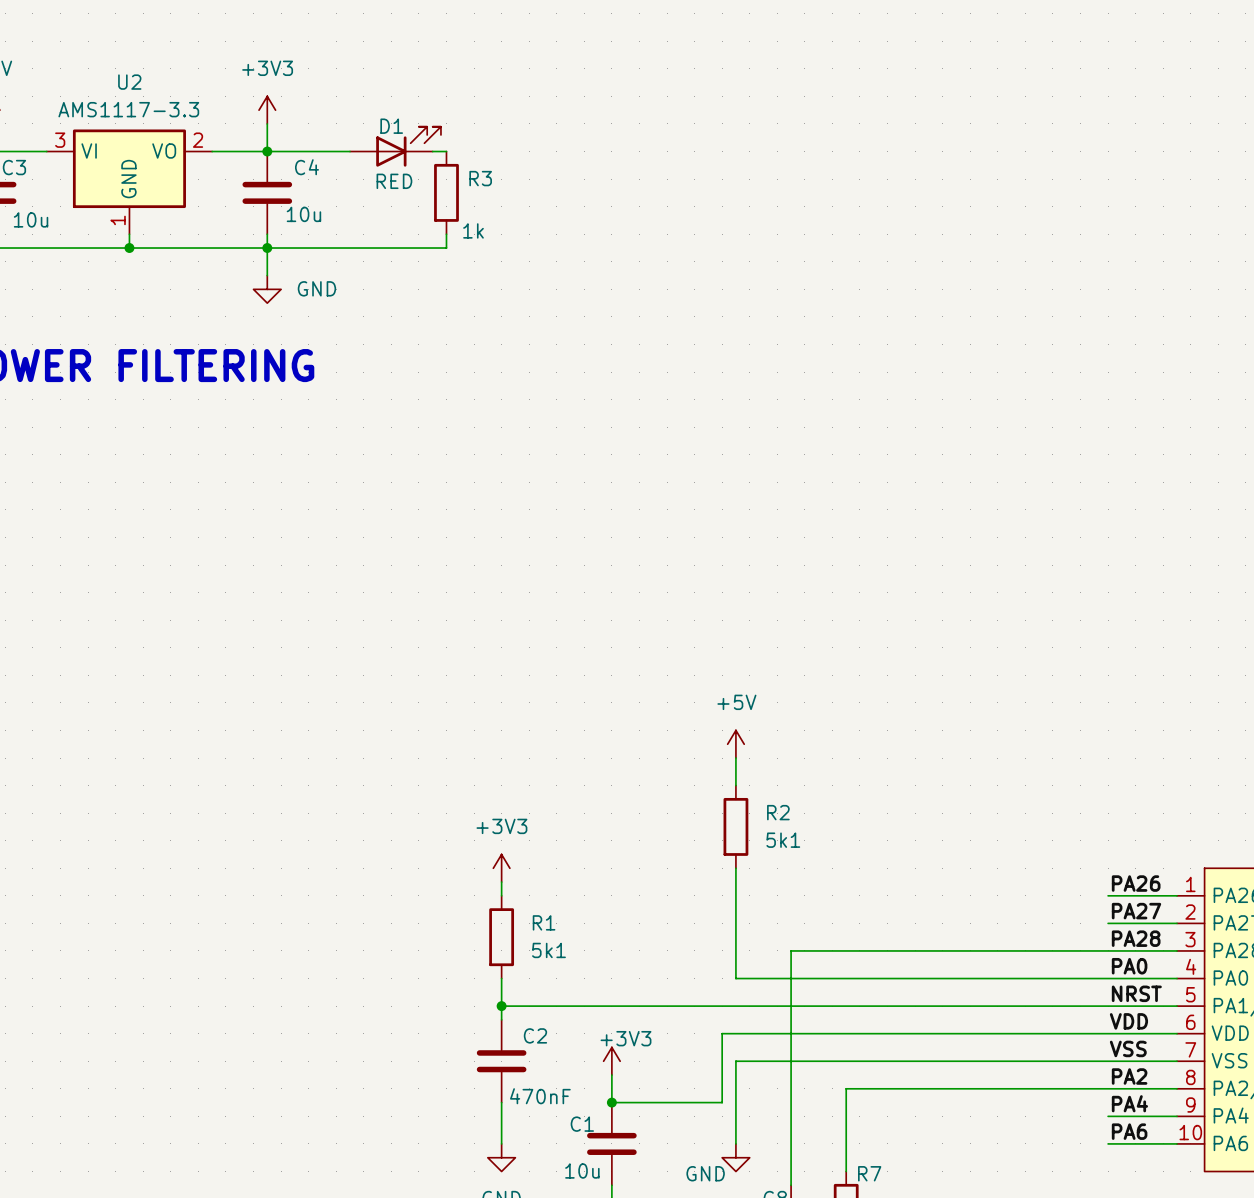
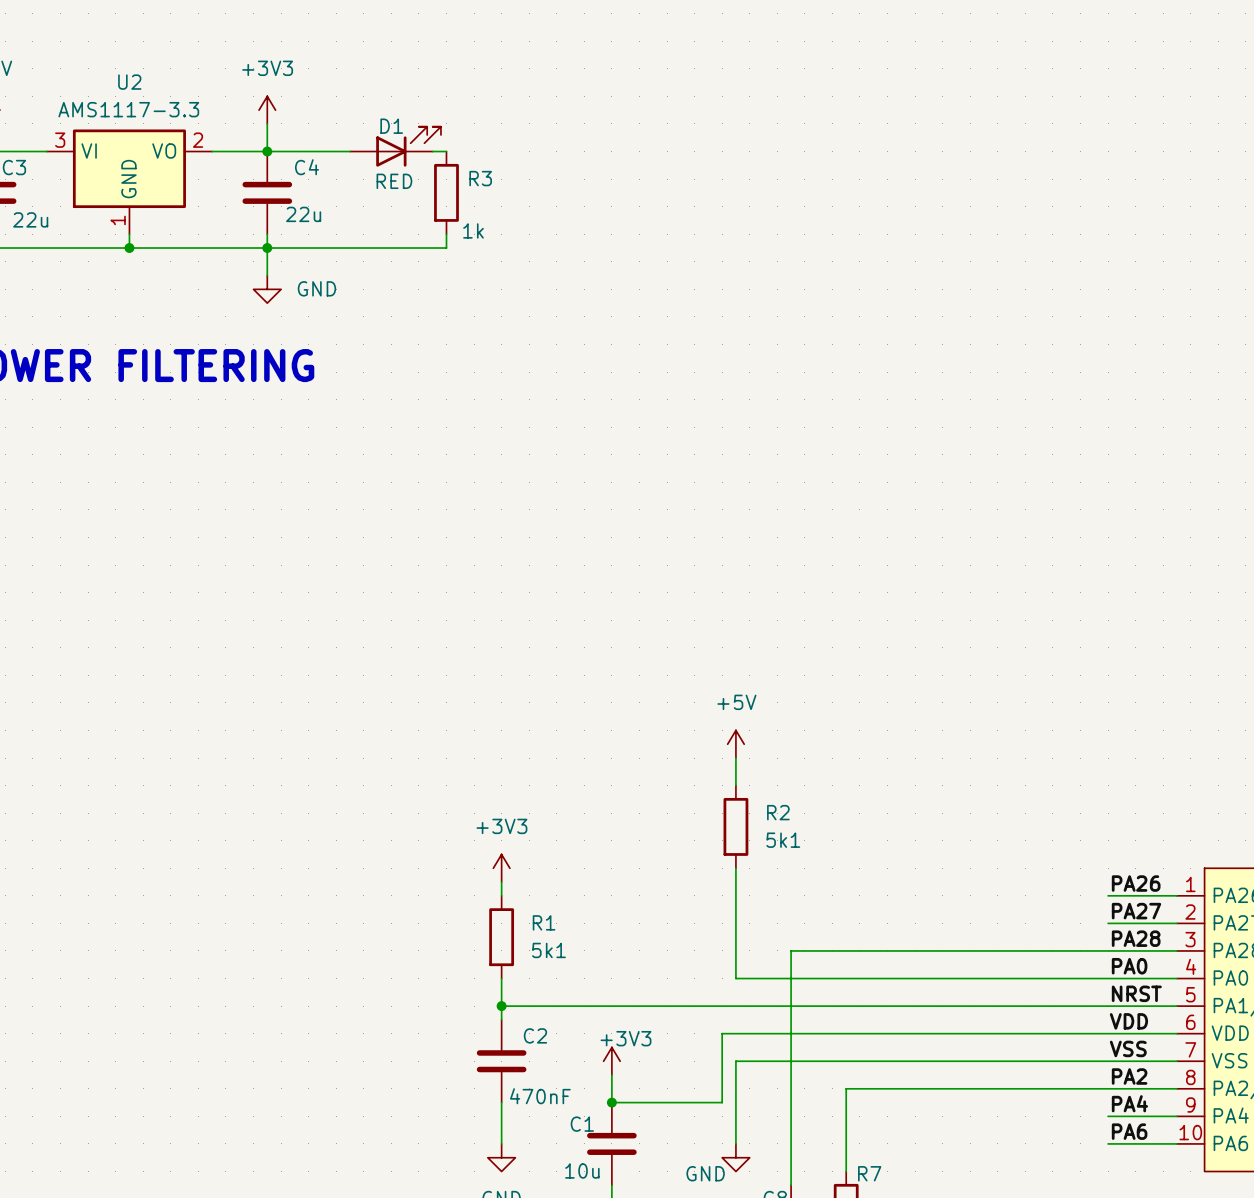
C4 value: 10u (303, 214) -> 22u (303, 214)
C3 value: 10u (31, 219) -> 22u (30, 219)

